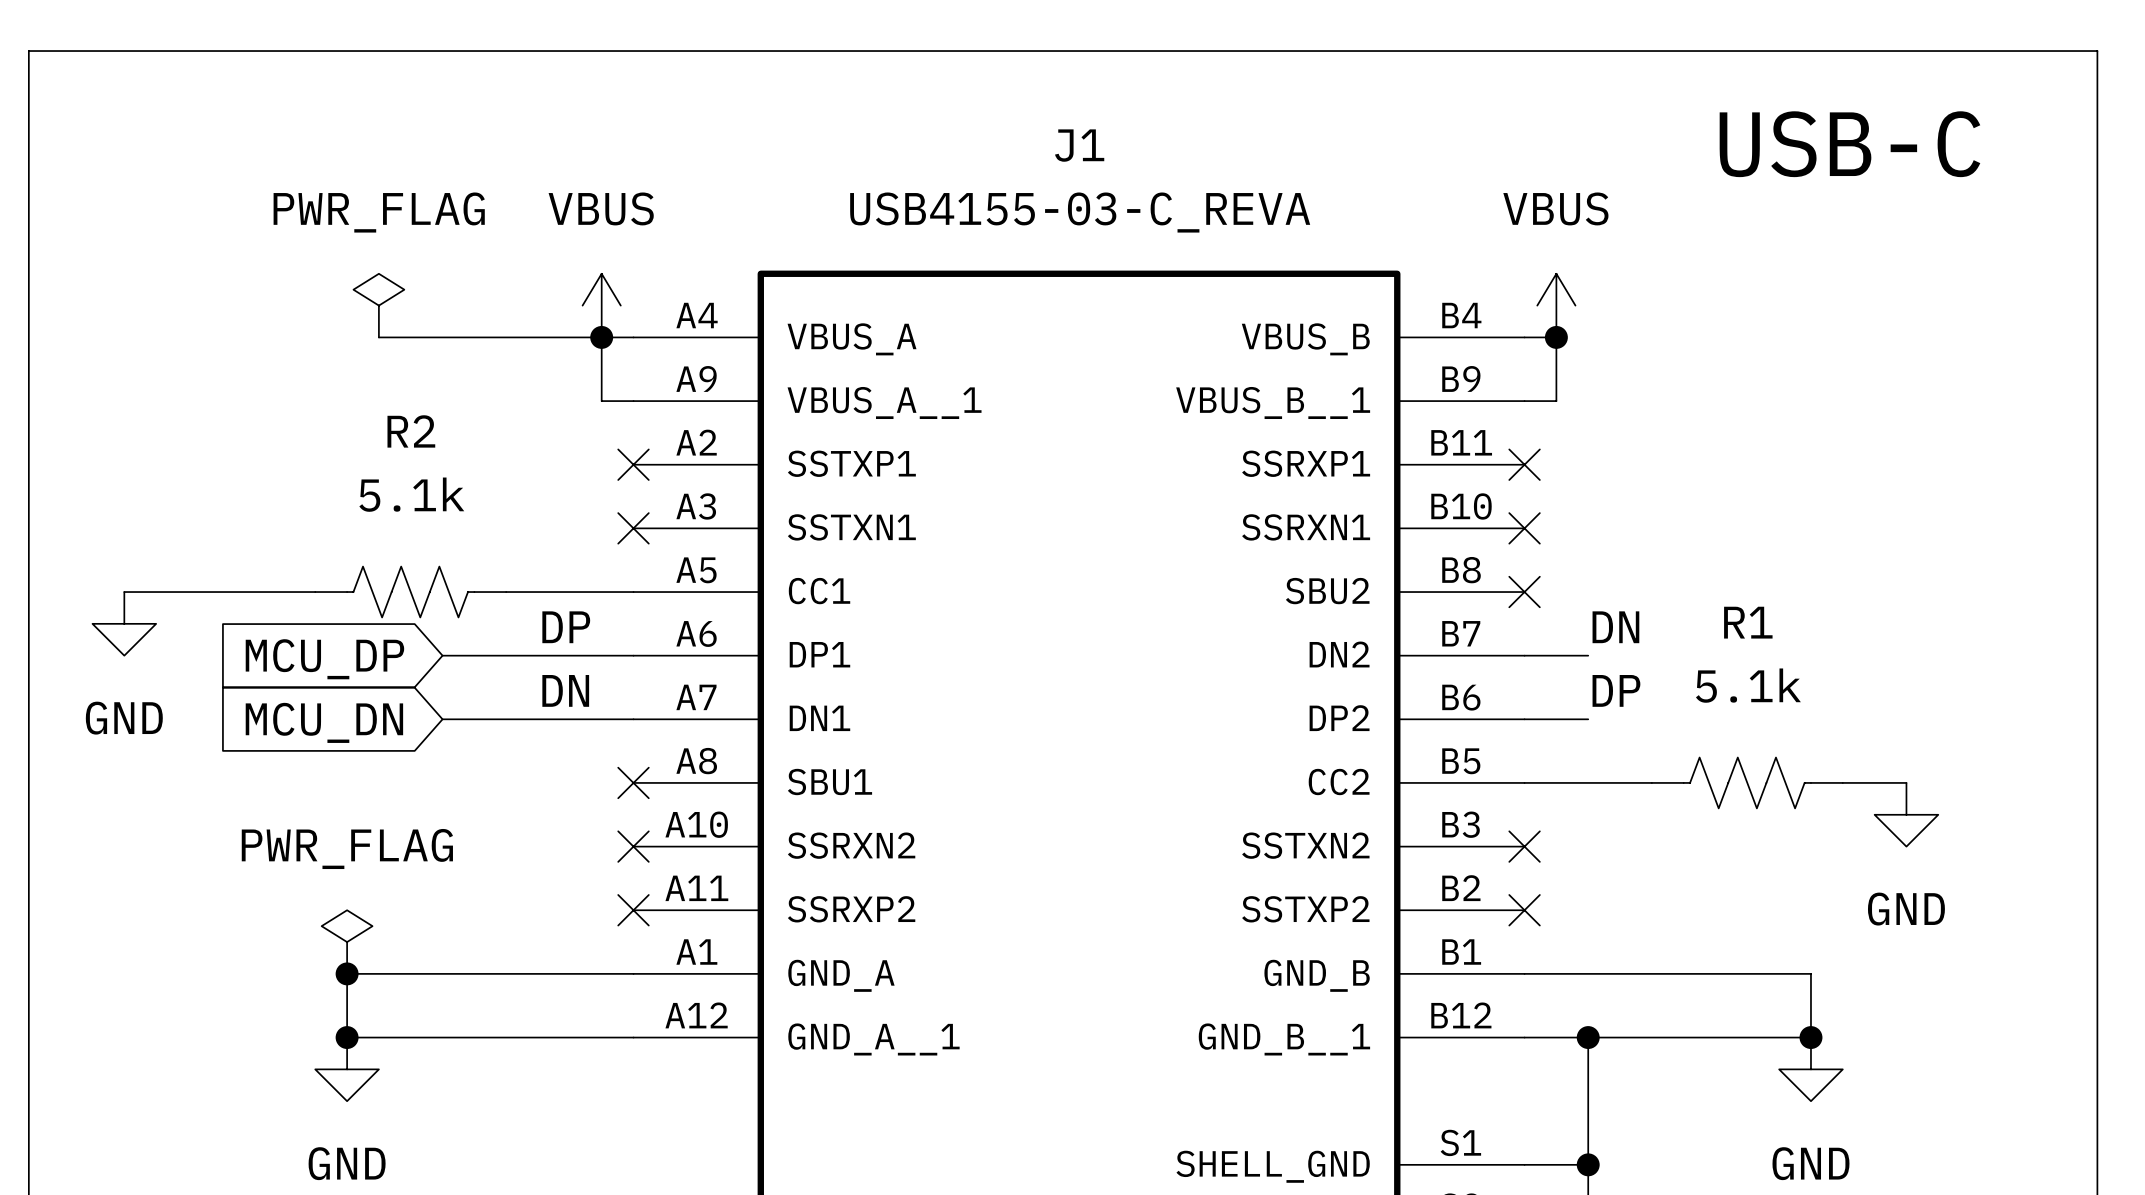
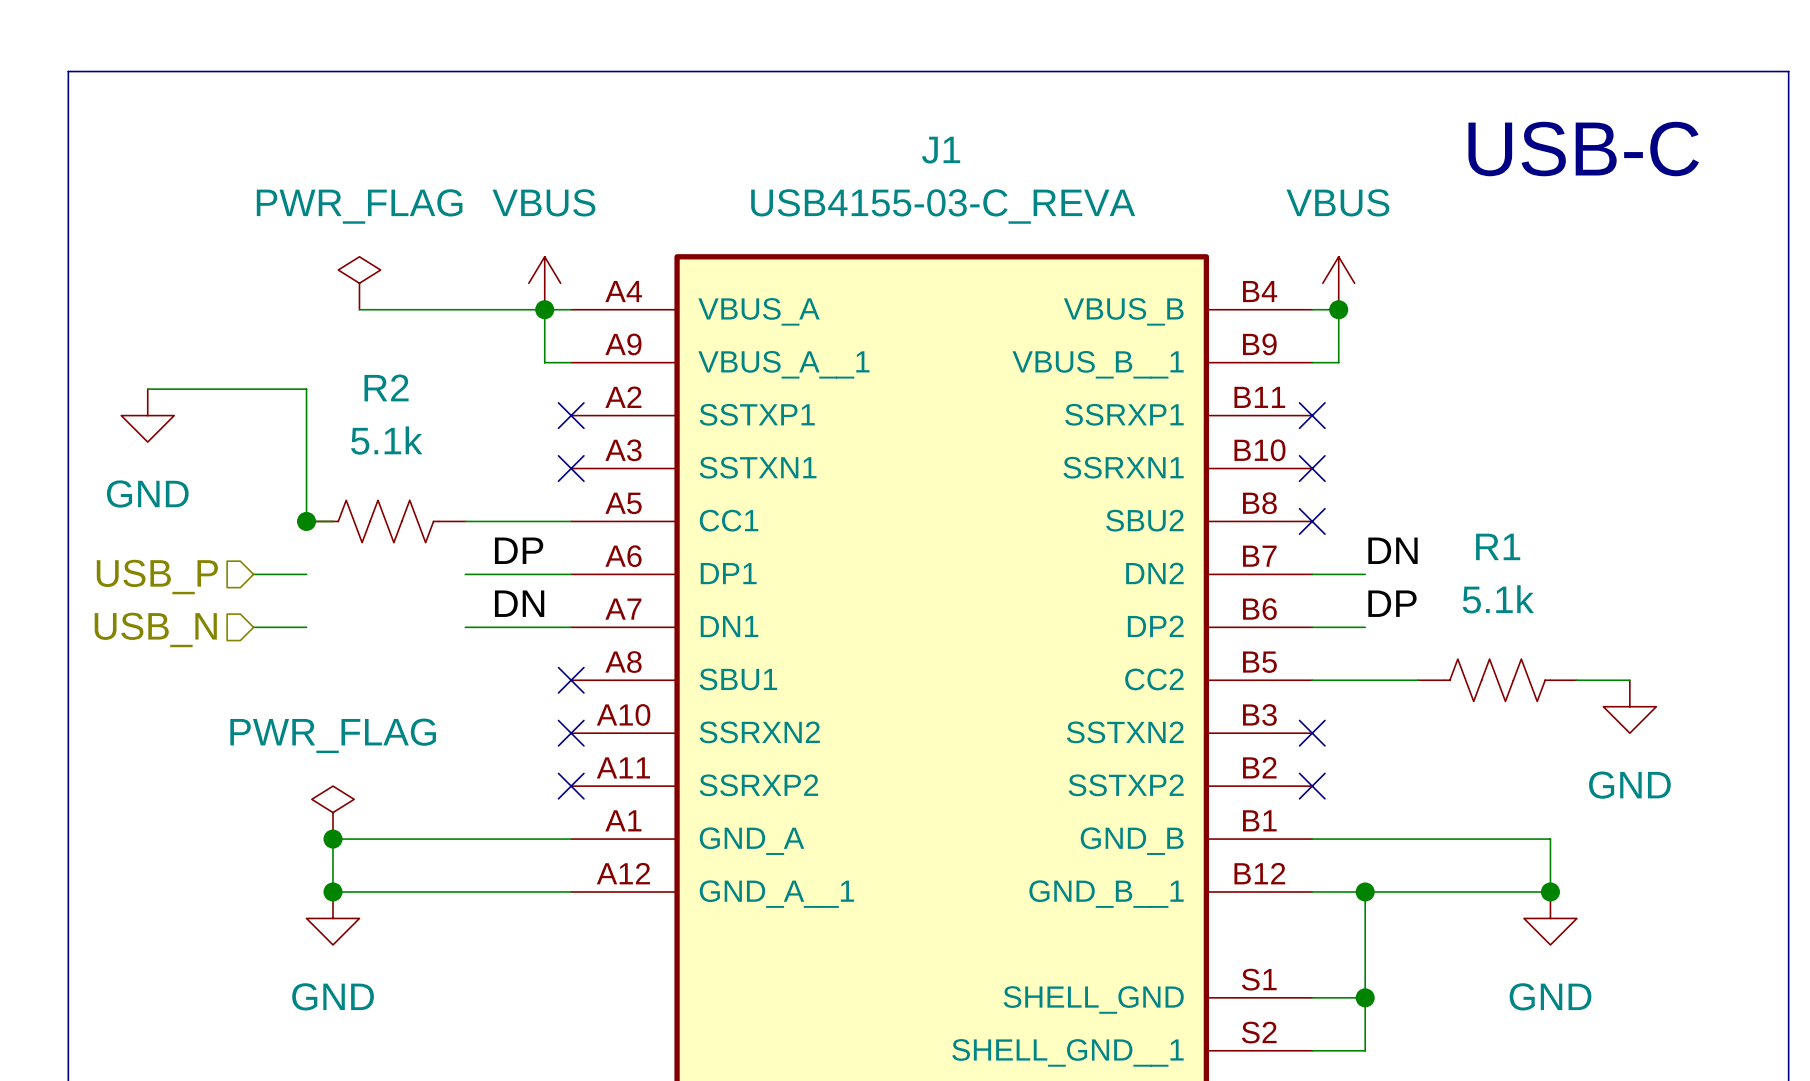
wire: none -> (147, 389) (306, 389) (306, 521) (333, 521)
wire: (124, 592) (315, 592) -> none
junction: none -> (306, 521)
power symbol position: GND (124, 623) -> GND (147, 415)
wire: (442, 655) (506, 655) -> (253, 574) (306, 574)
hierarchical label: none -> USB_P (157, 577)
global label: MCU_DP (324, 659) -> none
wire: (442, 719) (506, 719) -> (253, 627) (306, 627)
hierarchical label: none -> USB_N (155, 629)
global label: MCU_DN (324, 722) -> none

